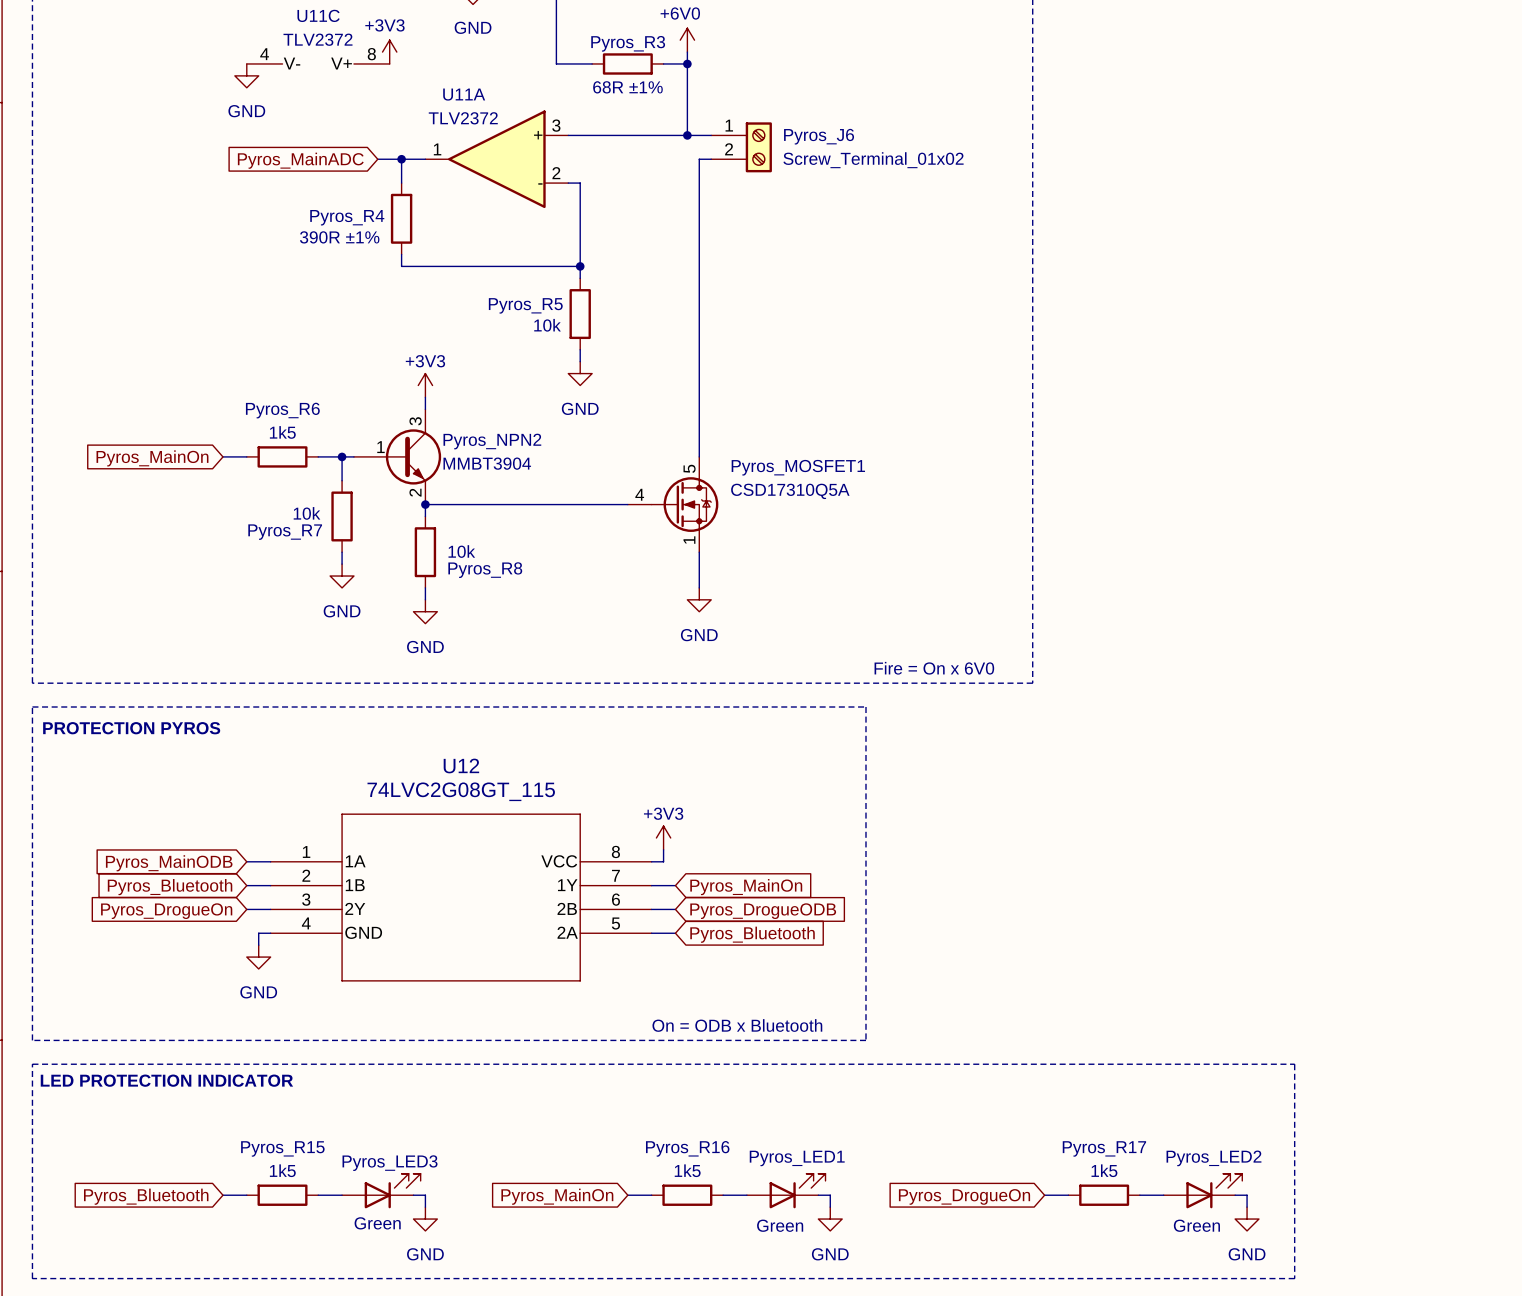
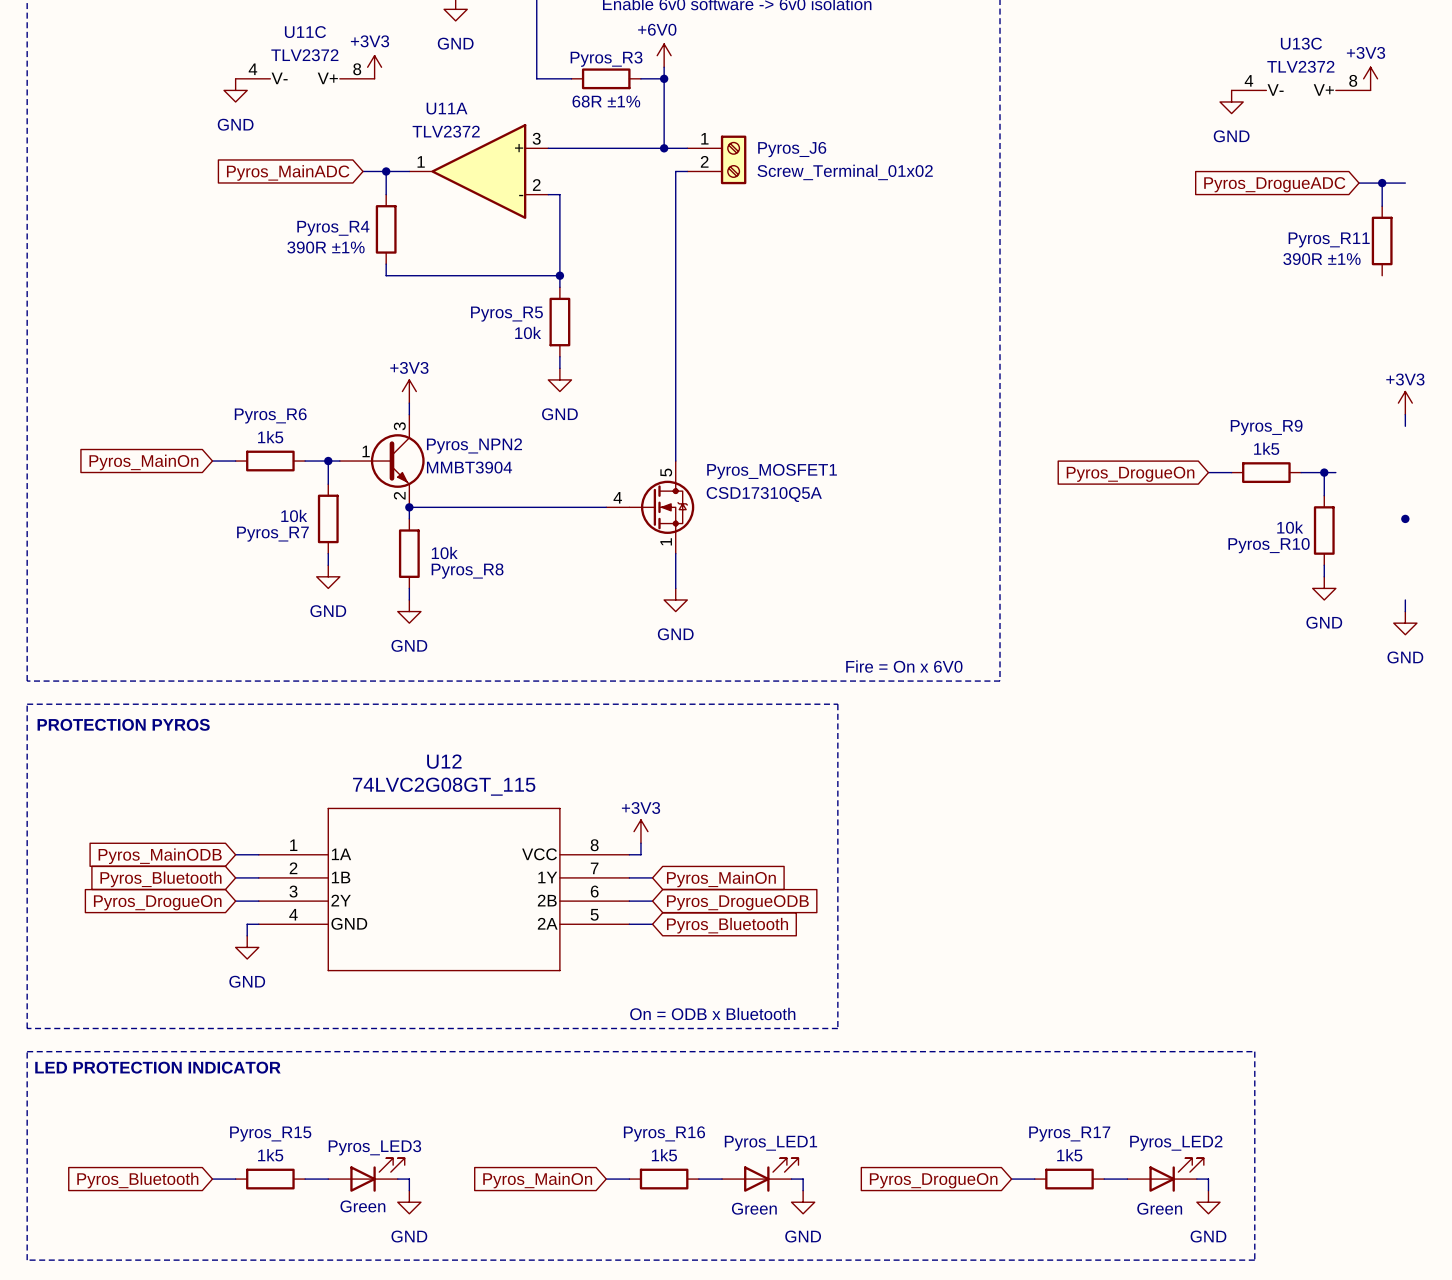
power symbol: none -> +3V3 (1370, 78)
U13C: none -> TLV2372 (1301, 90)
power symbol: none -> GND (1231, 101)
wire: none -> (1359, 183) (1405, 183)
wire: none -> (1382, 183) (1382, 206)
junction: none -> (1382, 183)
global label: none -> Pyros_DrogueADC (1274, 184)
Pyros_R11: none -> 390R ±1% (1382, 240)
power symbol: none -> +3V3 (1405, 403)
wire: none -> (1405, 414) (1405, 426)
wire: none -> (1208, 472) (1231, 472)
Pyros_R9: none -> 1k5 (1266, 472)
wire: none -> (1301, 472) (1335, 472)
wire: none -> (1324, 472) (1324, 495)
junction: none -> (1324, 472)
global label: none -> Pyros_DrogueOn (1130, 474)
junction: none -> (1405, 518)
Pyros_R10: none -> 10k (1324, 530)
wire: none -> (1324, 565) (1324, 576)
power symbol: none -> GND (1324, 588)
wire: none -> (1405, 599) (1405, 611)
power symbol: none -> GND (1405, 623)

